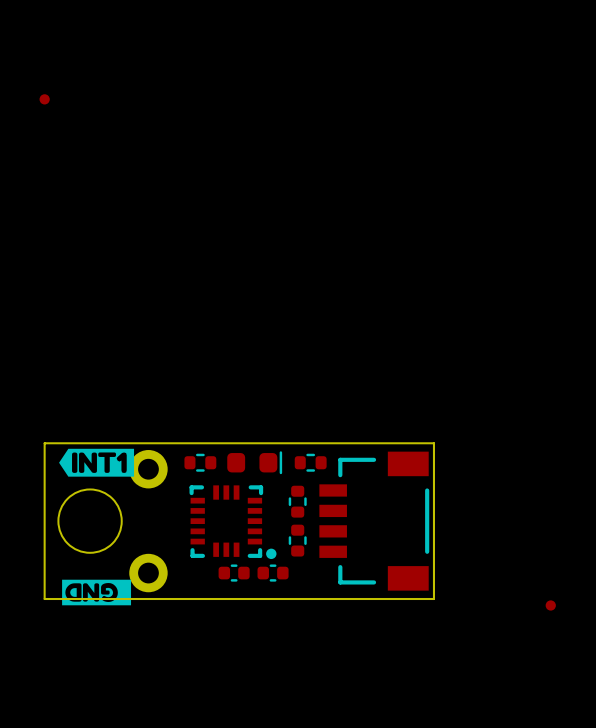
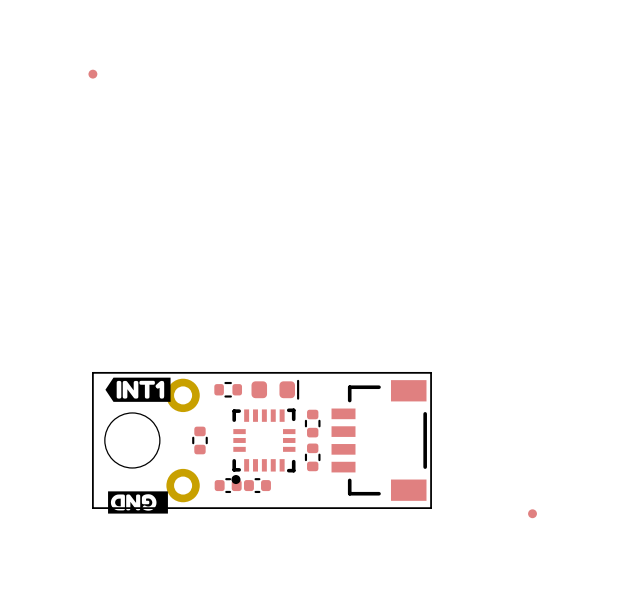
part rotation: 0° (310, 462) -> 90° clockwise (199, 440)
part position: (310, 462) -> (199, 440)
part rotation: 0° (233, 522) -> 90° clockwise (263, 446)
part position: (273, 573) -> (228, 485)

